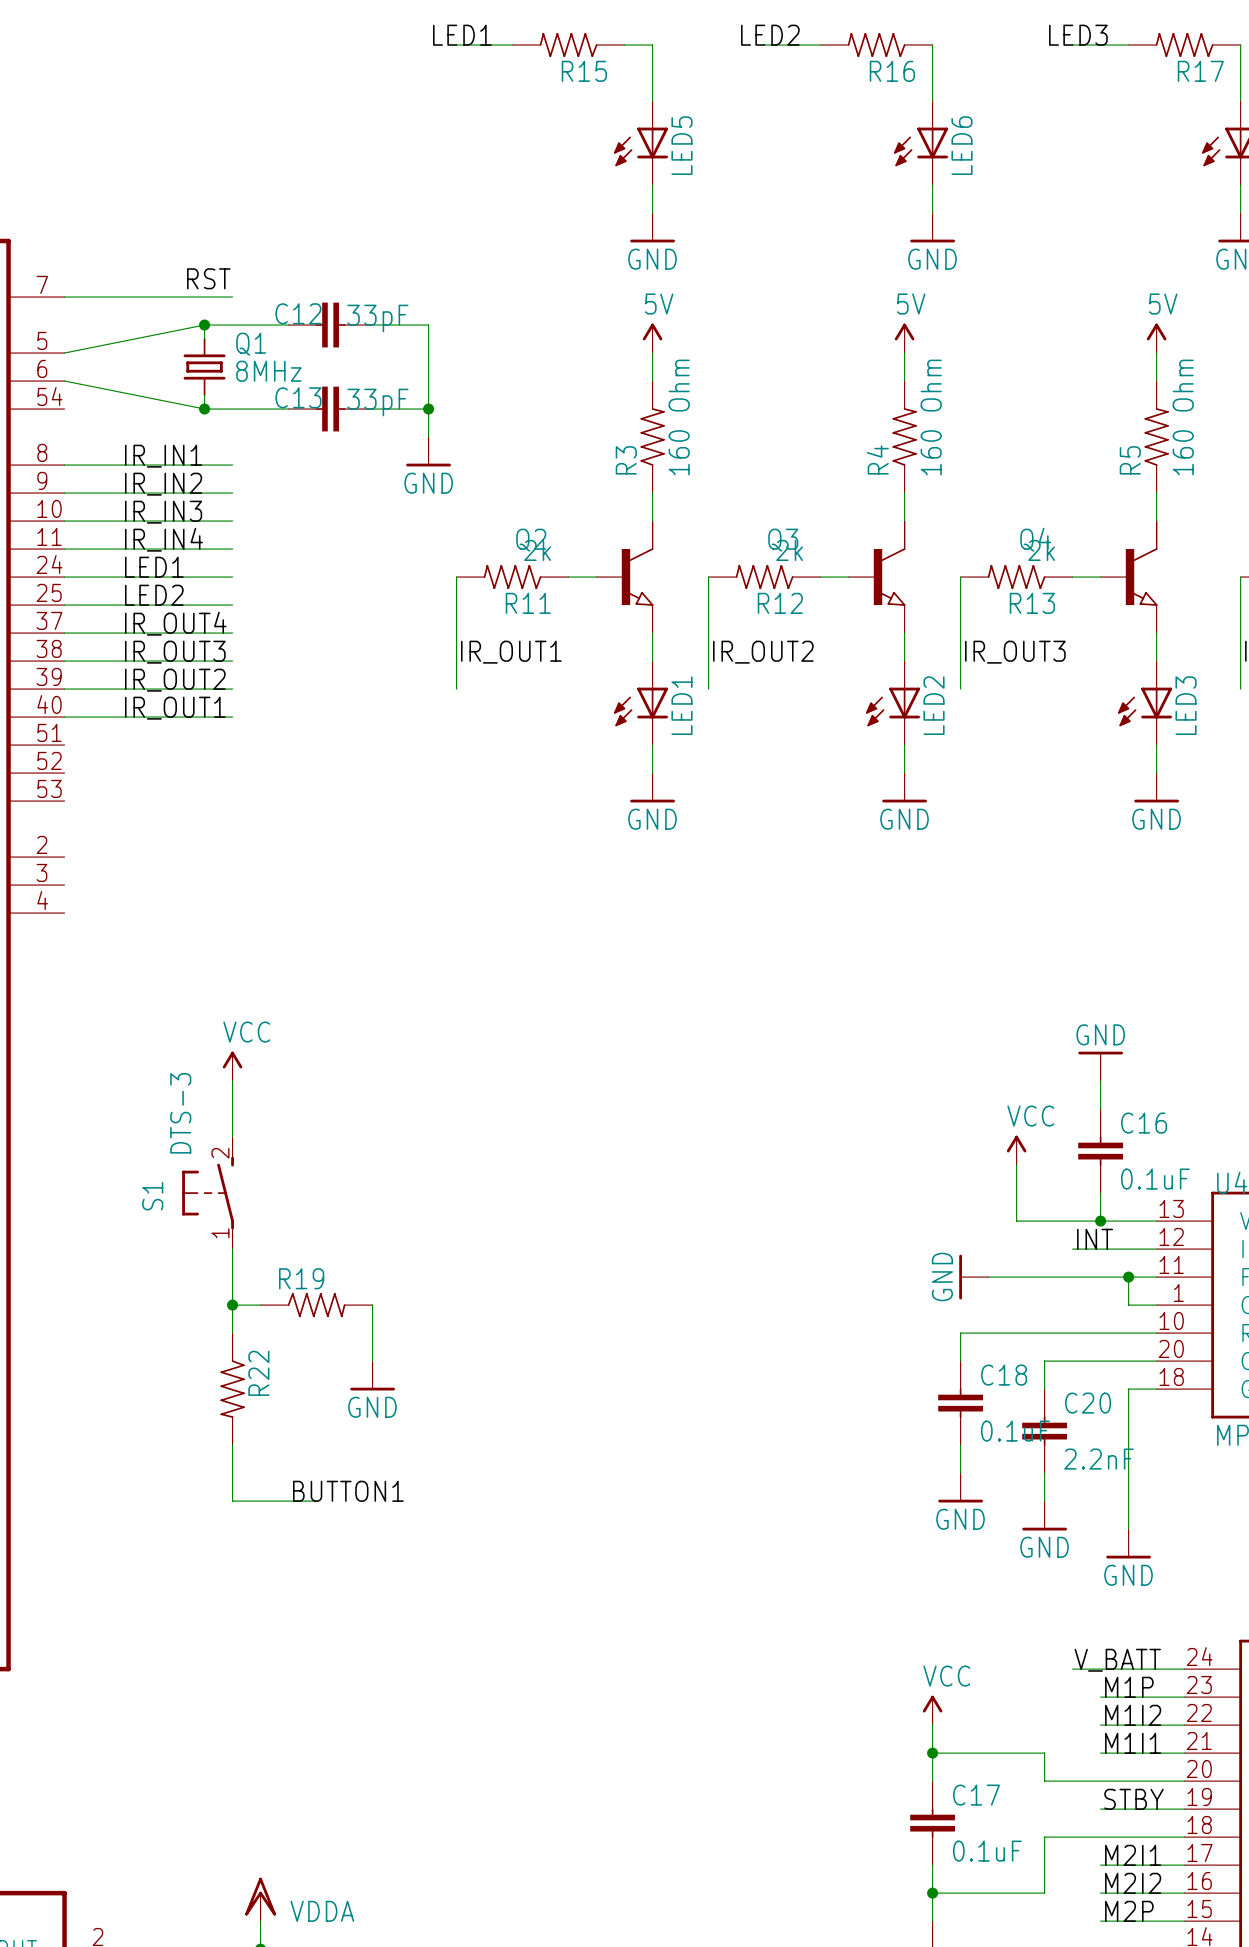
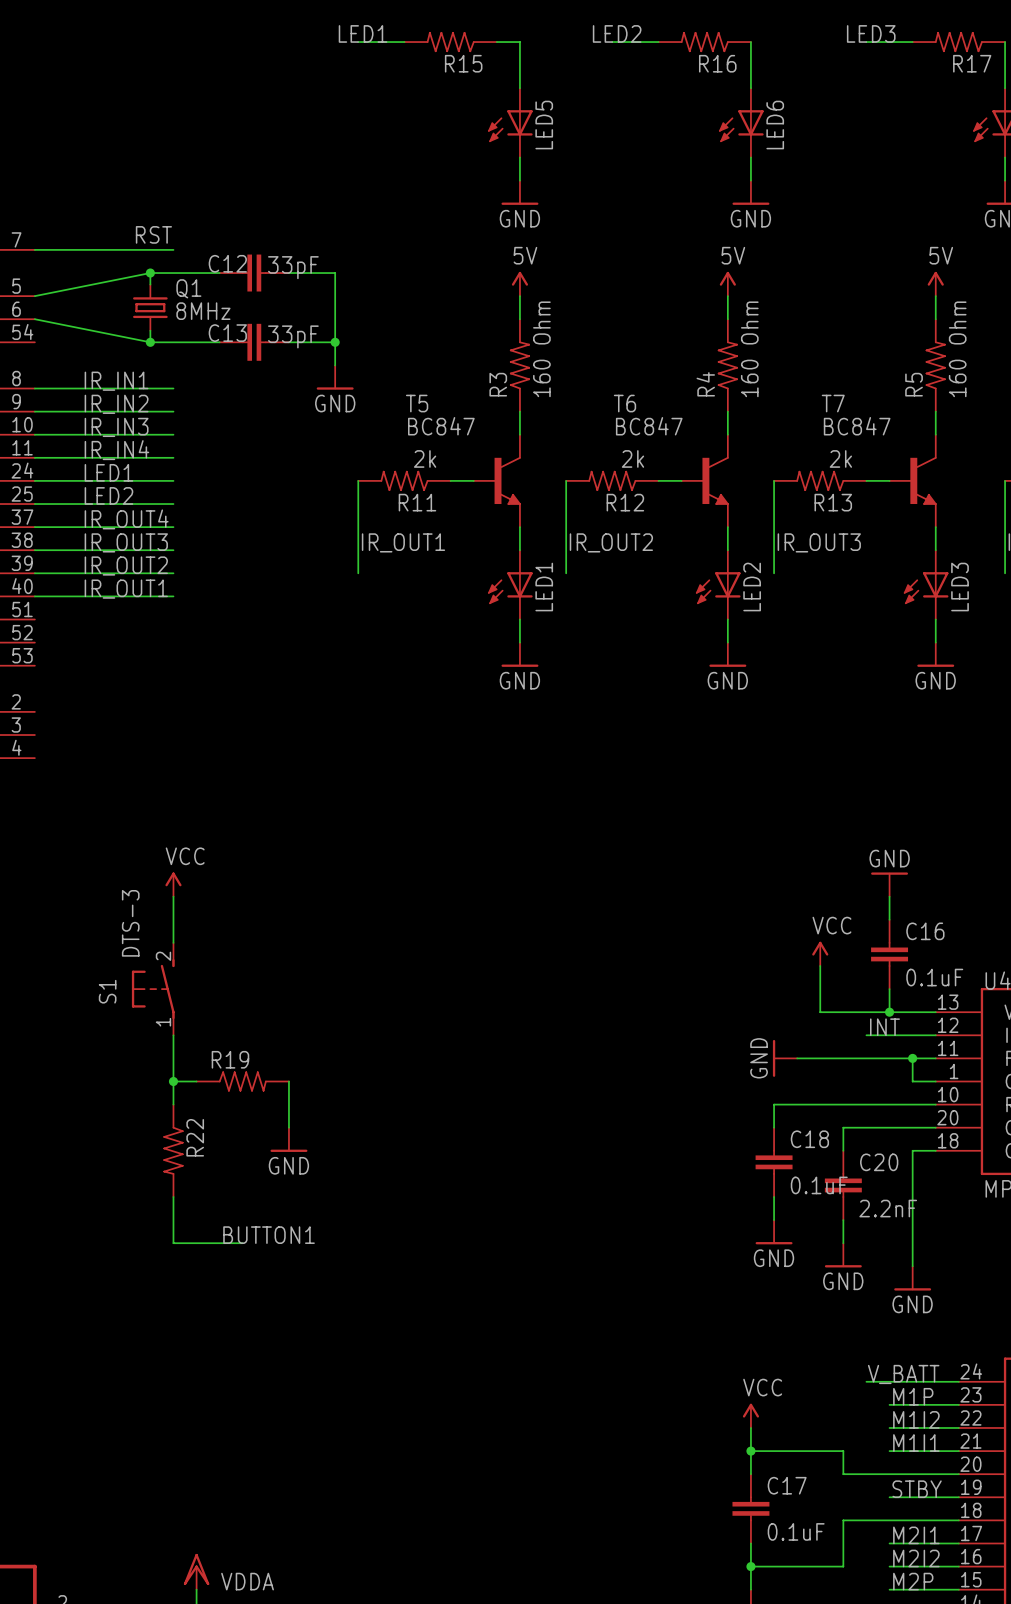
Q2: (625, 577) -> none
T5: none -> BC847 (497, 480)
Q3: (877, 577) -> none
T6: none -> BC847 (705, 480)
Q4: (1129, 577) -> none
T7: none -> BC847 (913, 480)

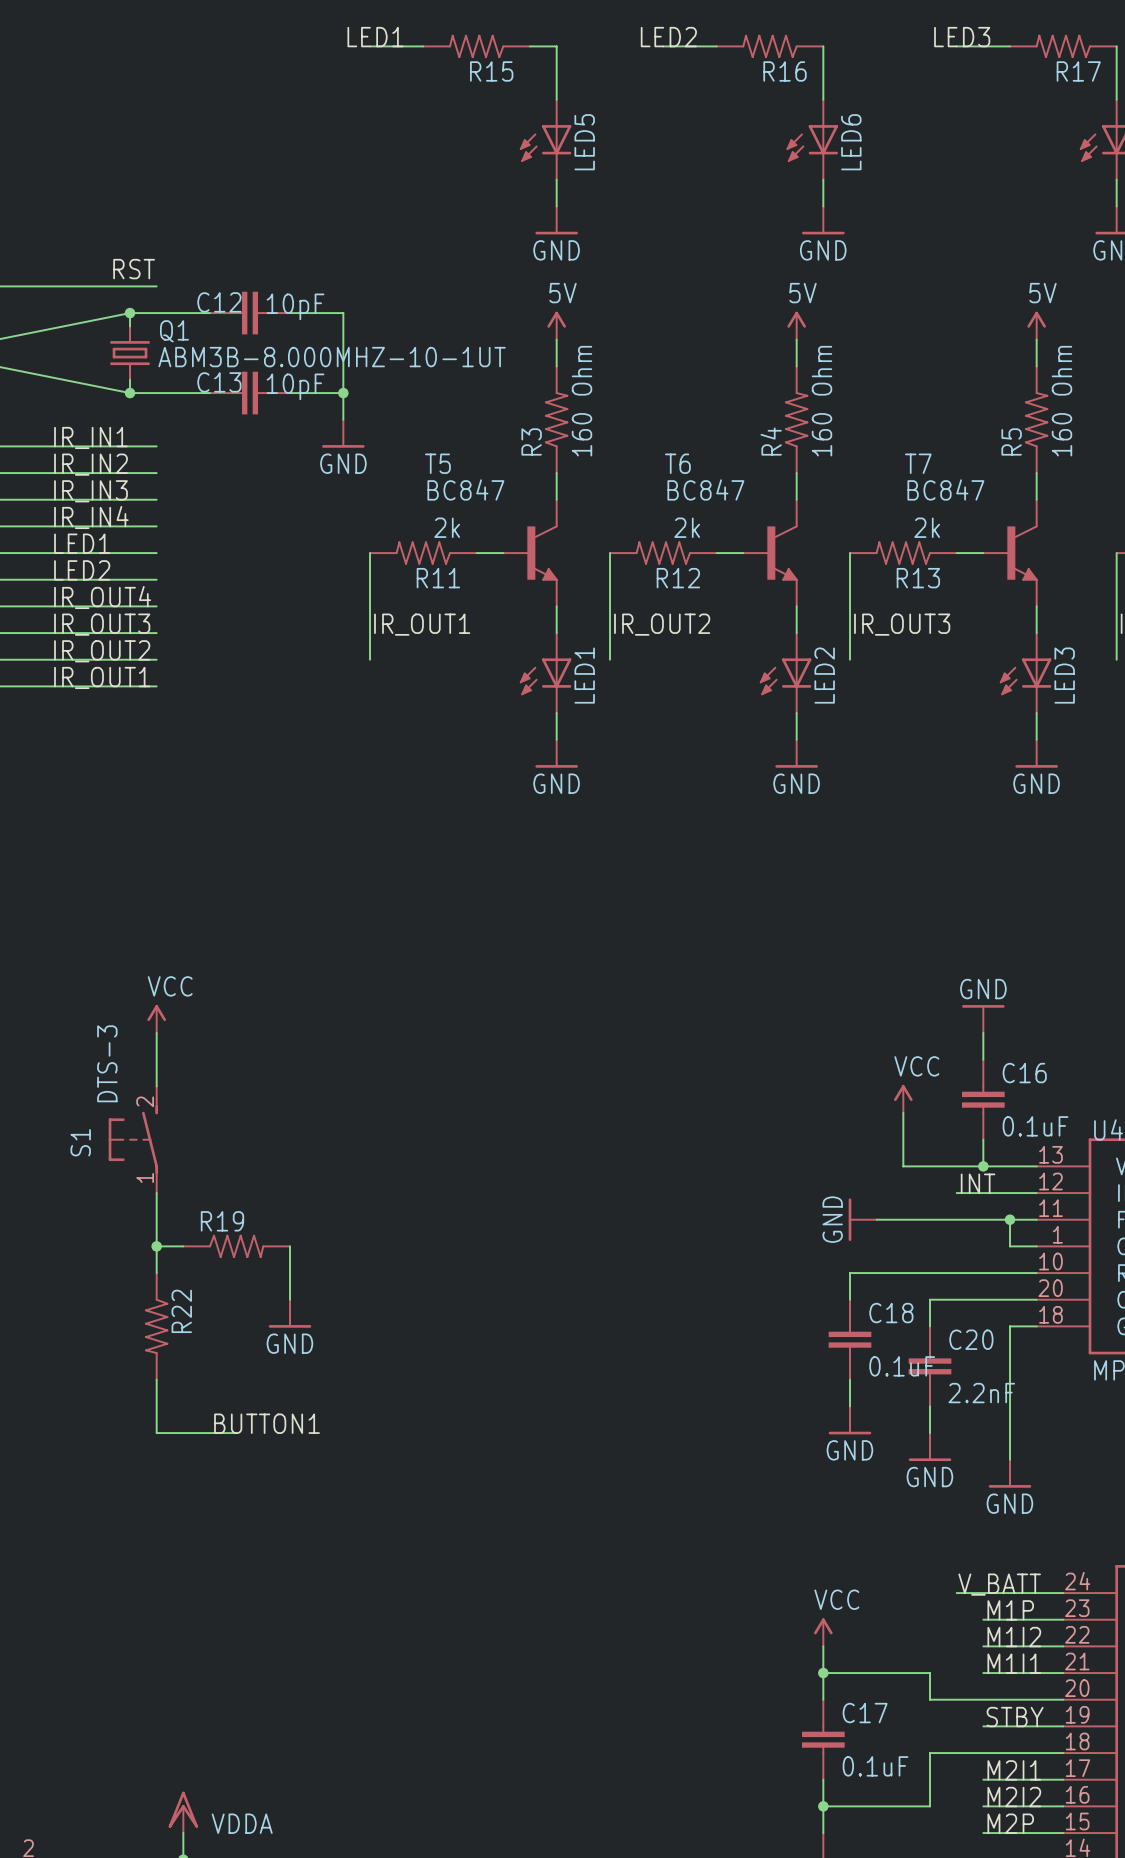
C12 value: 33pF (293, 267) -> 10pF (295, 306)
Q1 value: 8MHz (203, 311) -> ABM3B-8.000MHZ-10-1UT (332, 357)
C13 value: 33pF (293, 336) -> 10pF (295, 386)

